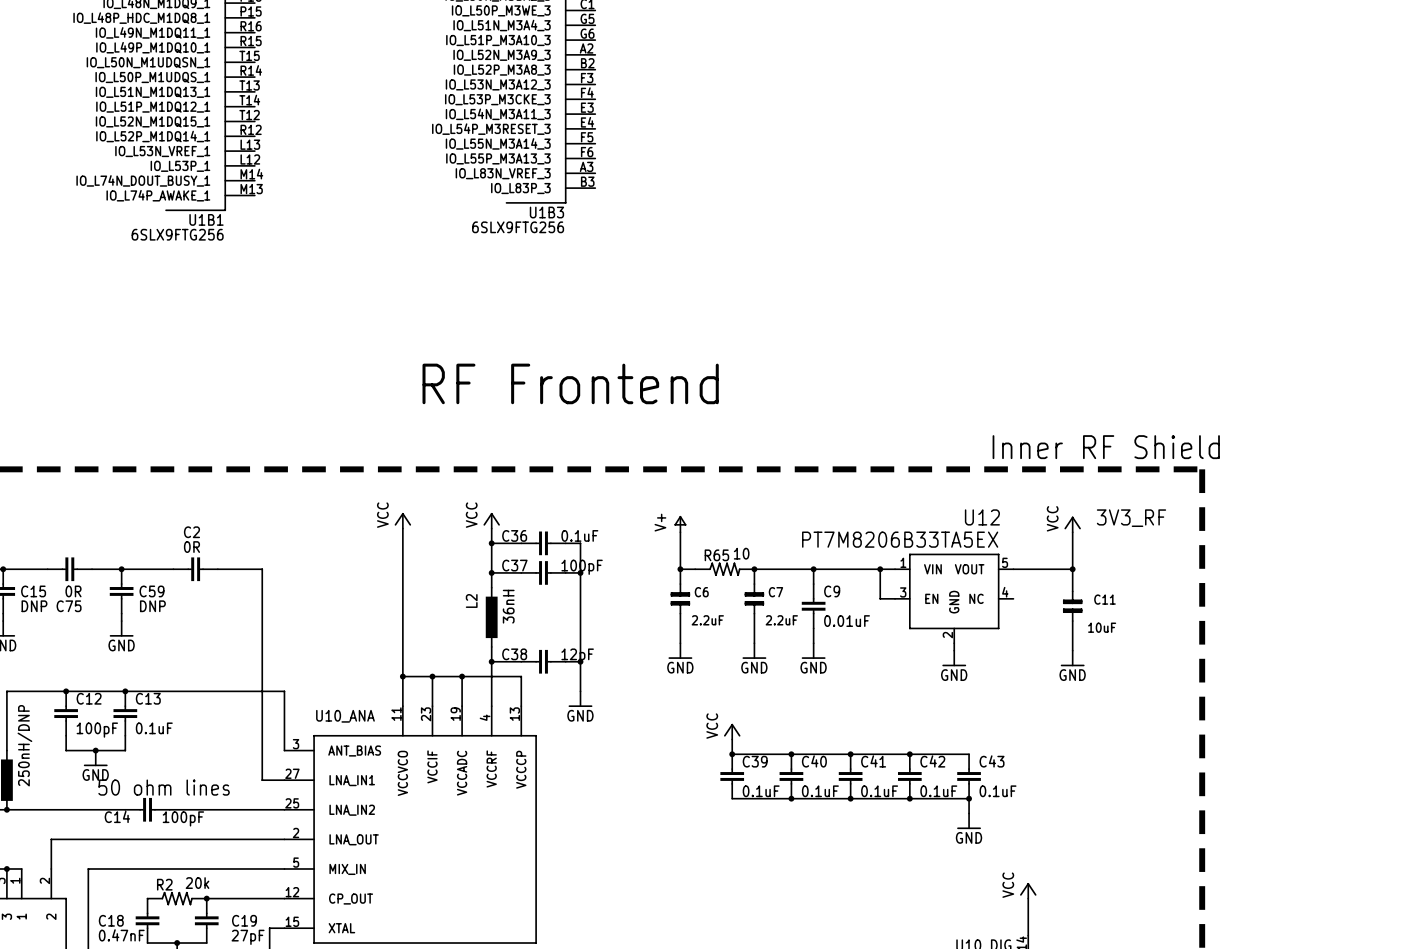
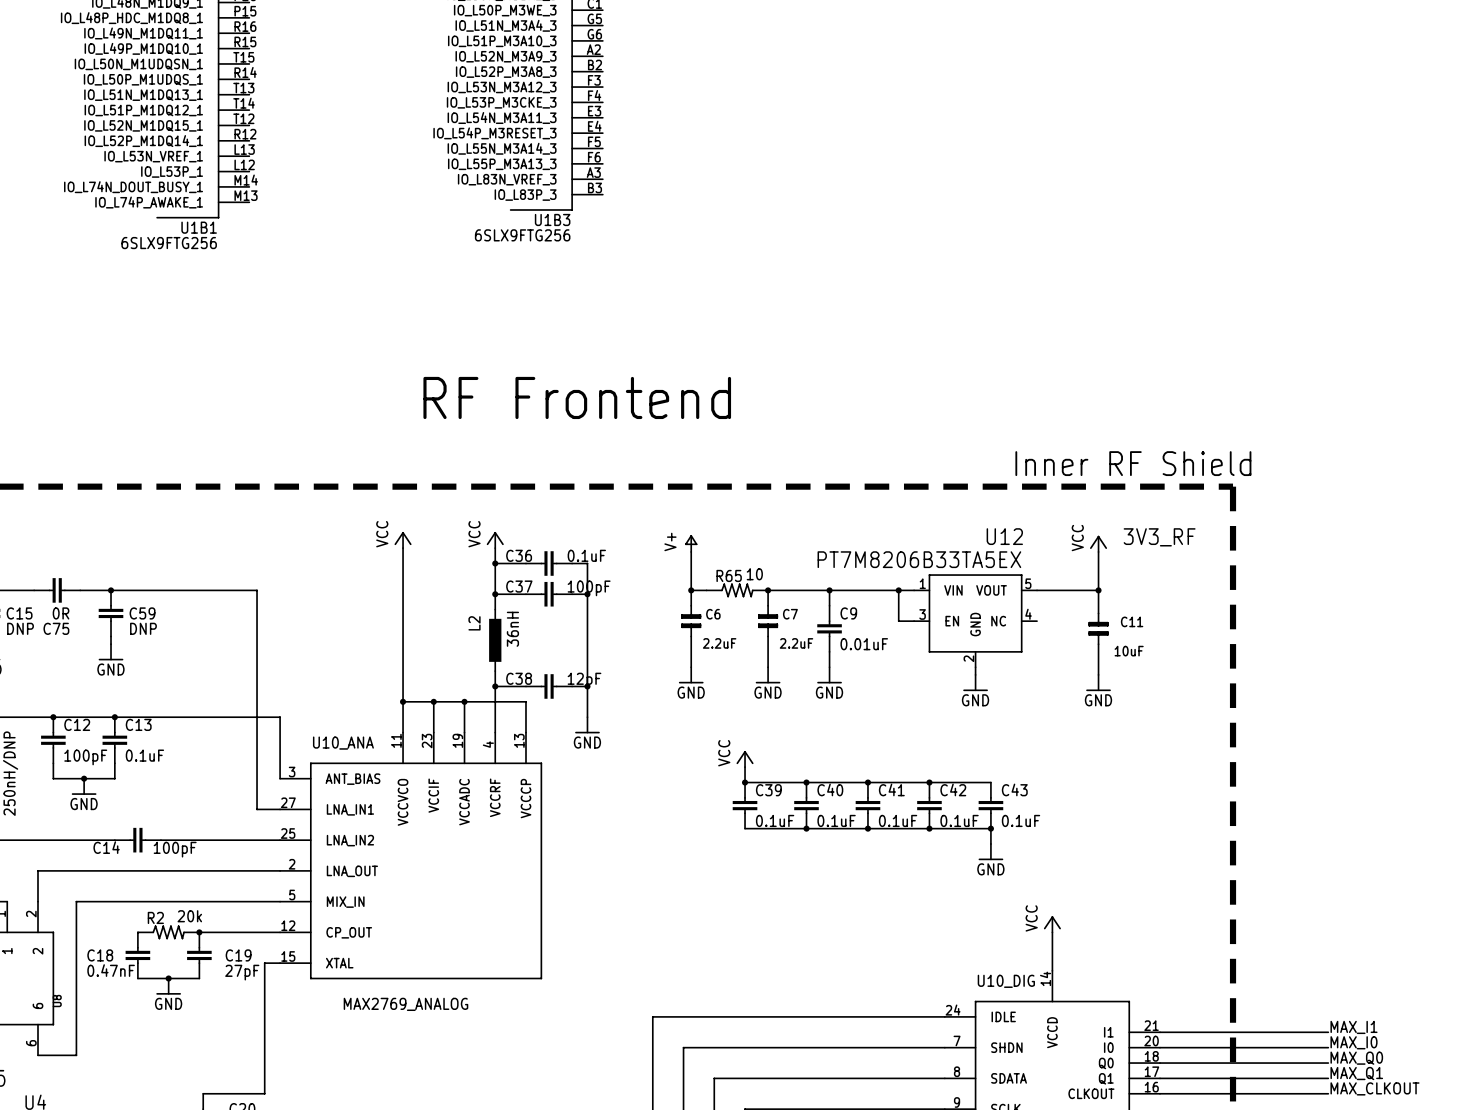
C2: 0R (195, 569) -> none
text: 50 ohm lines (164, 787) -> none

